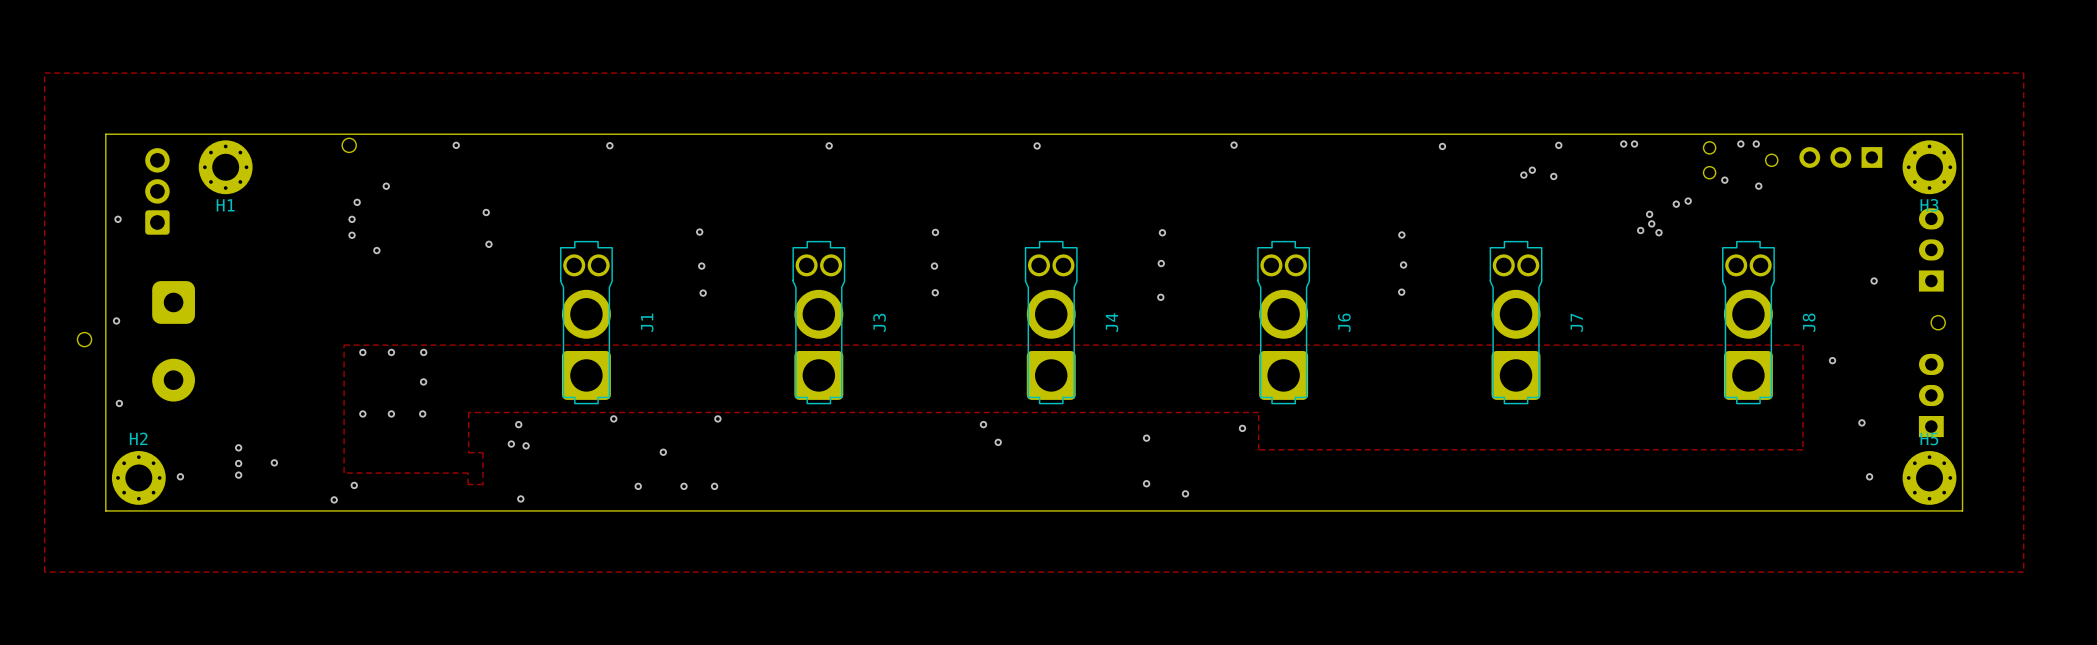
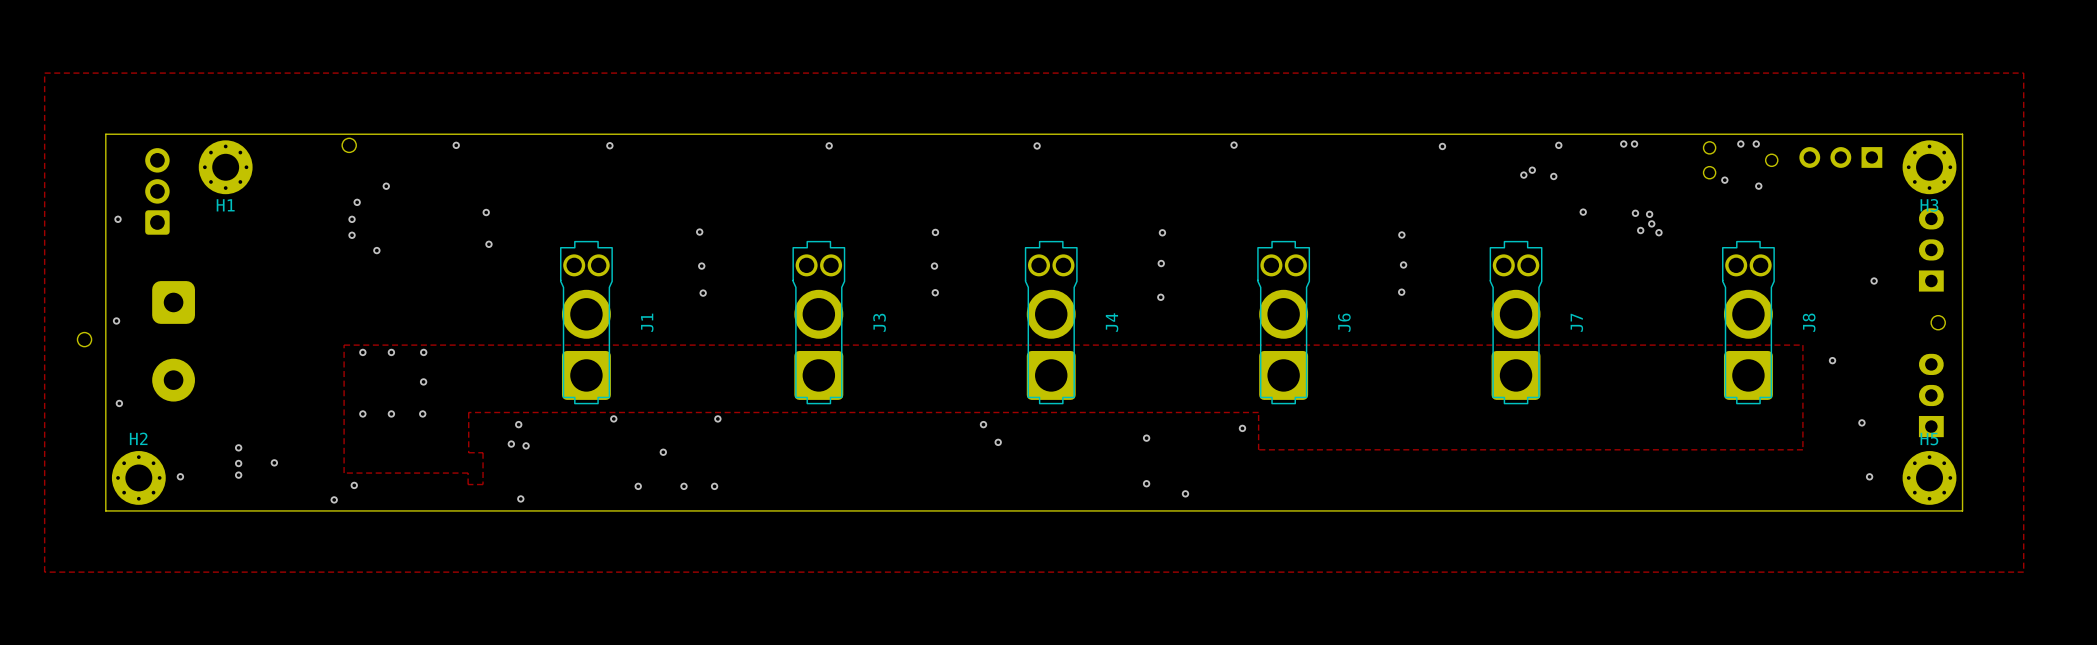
via: (1688, 201) -> none
via: (1676, 204) -> none
via: none -> (1583, 212)
via: none -> (1635, 213)

